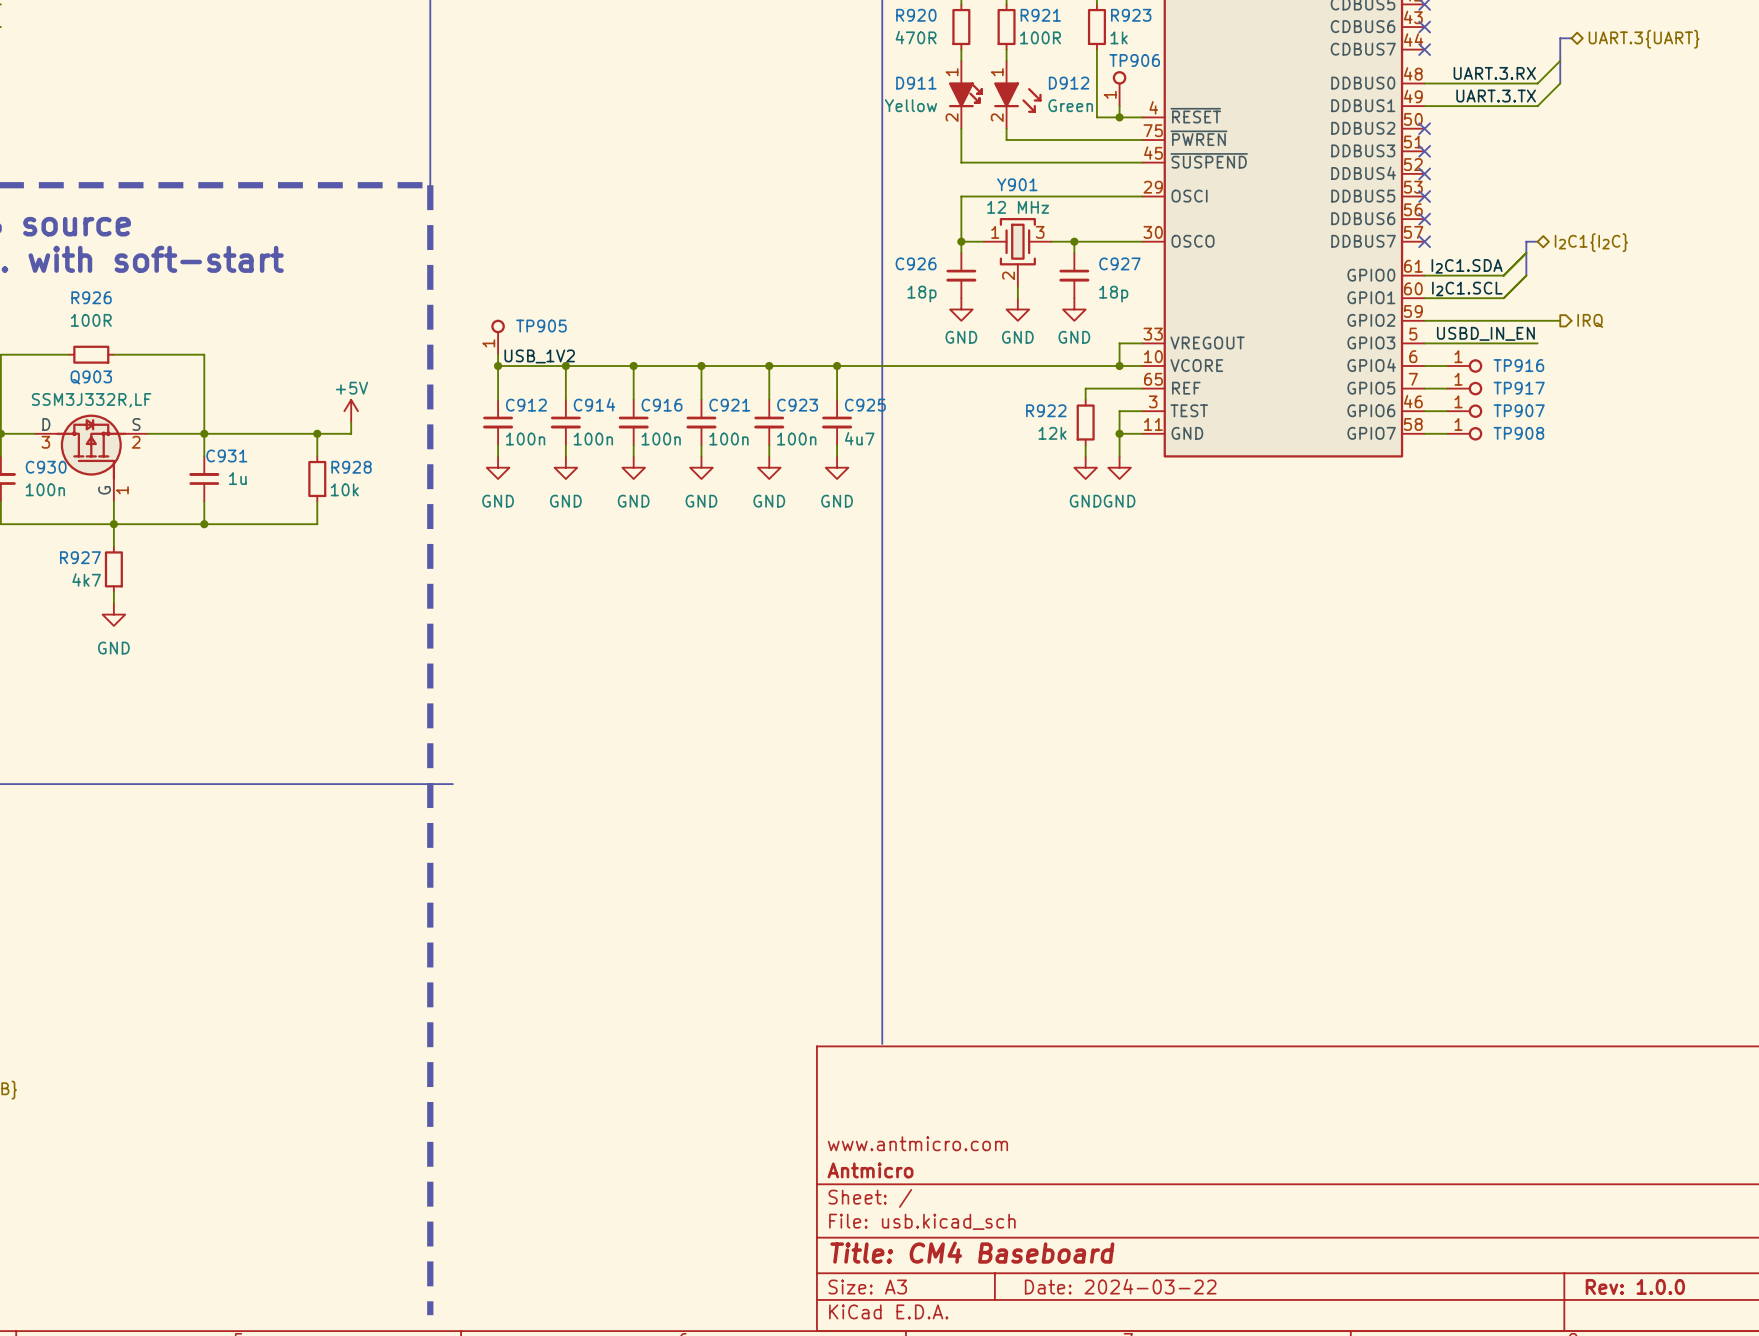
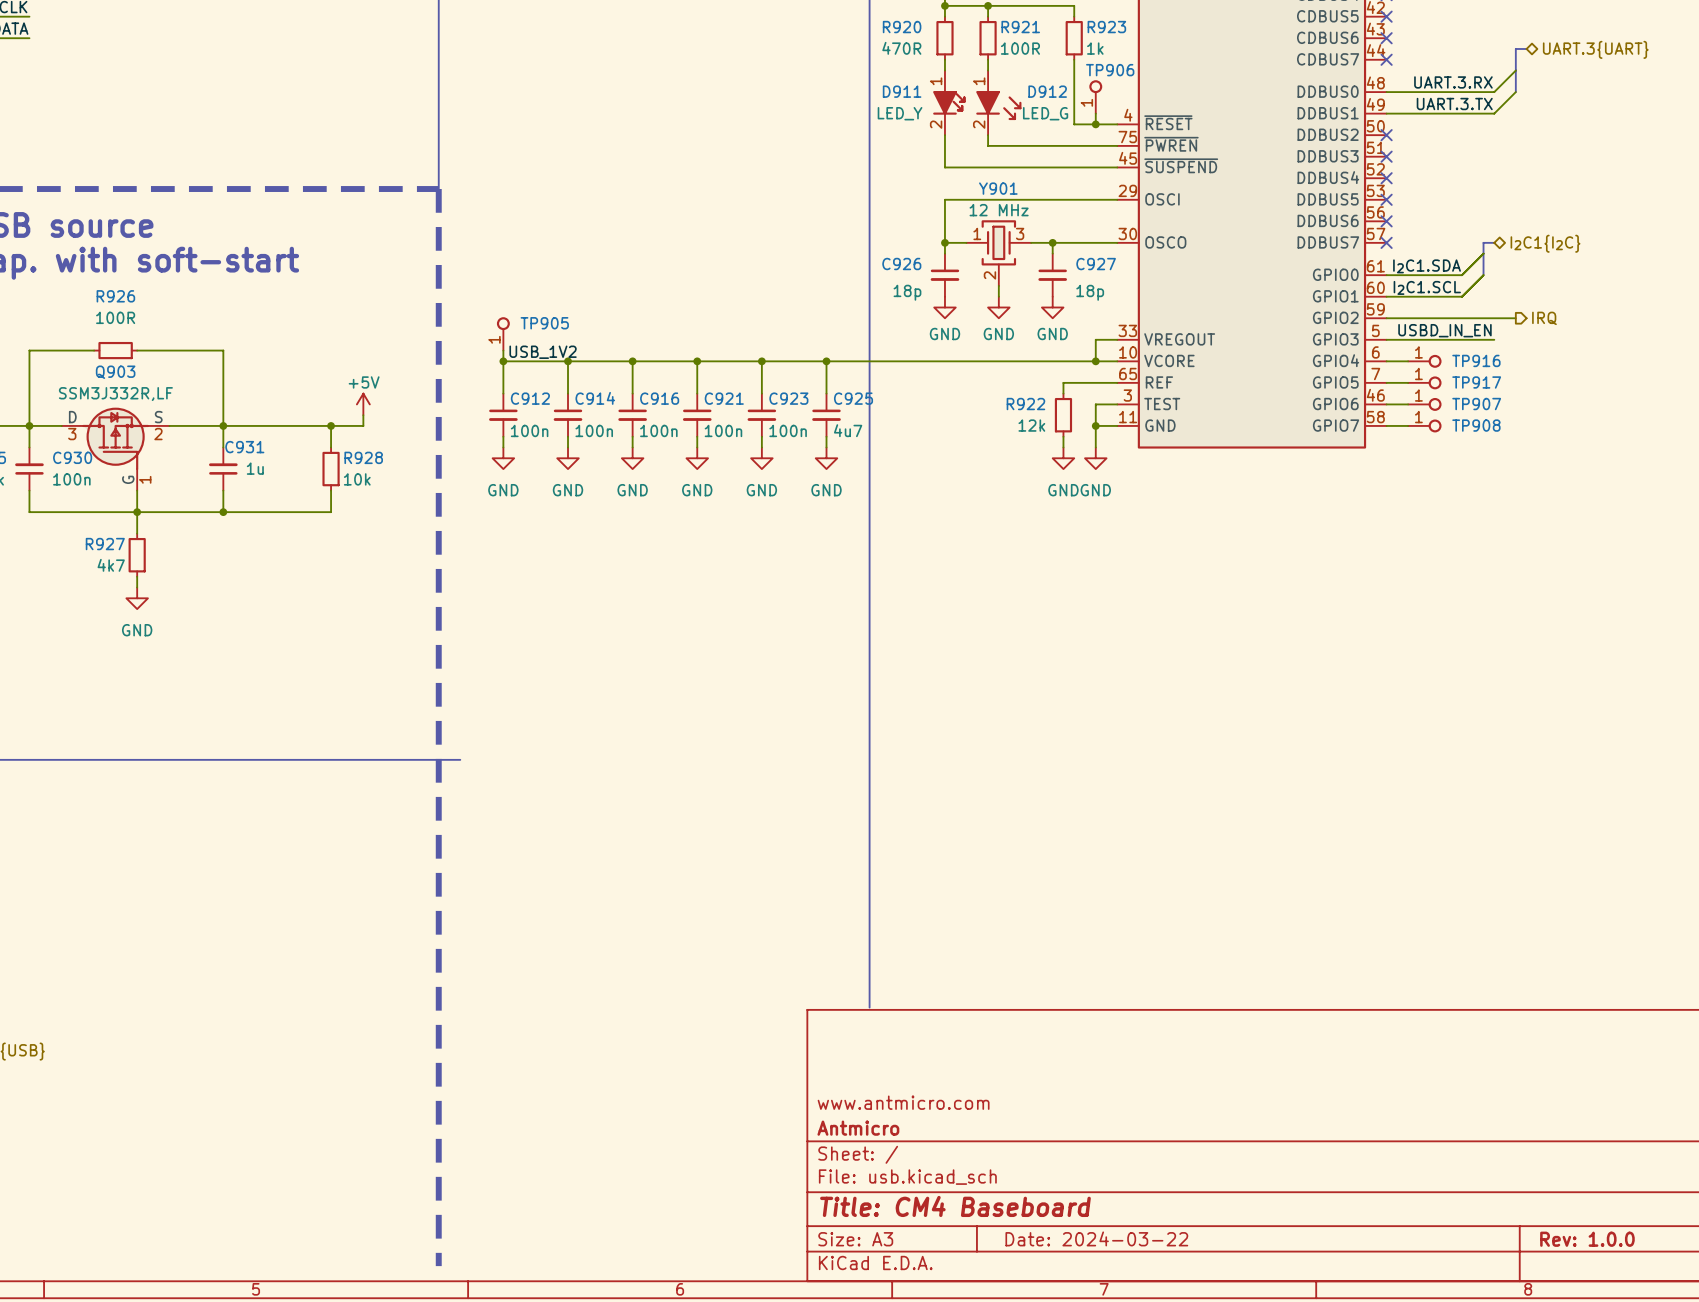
D911 text: Yellow (910, 105) -> none
D912 text: Green (1070, 105) -> none
D911 value: none -> LED_Y (900, 113)
D912 value: none -> LED_G (1045, 113)

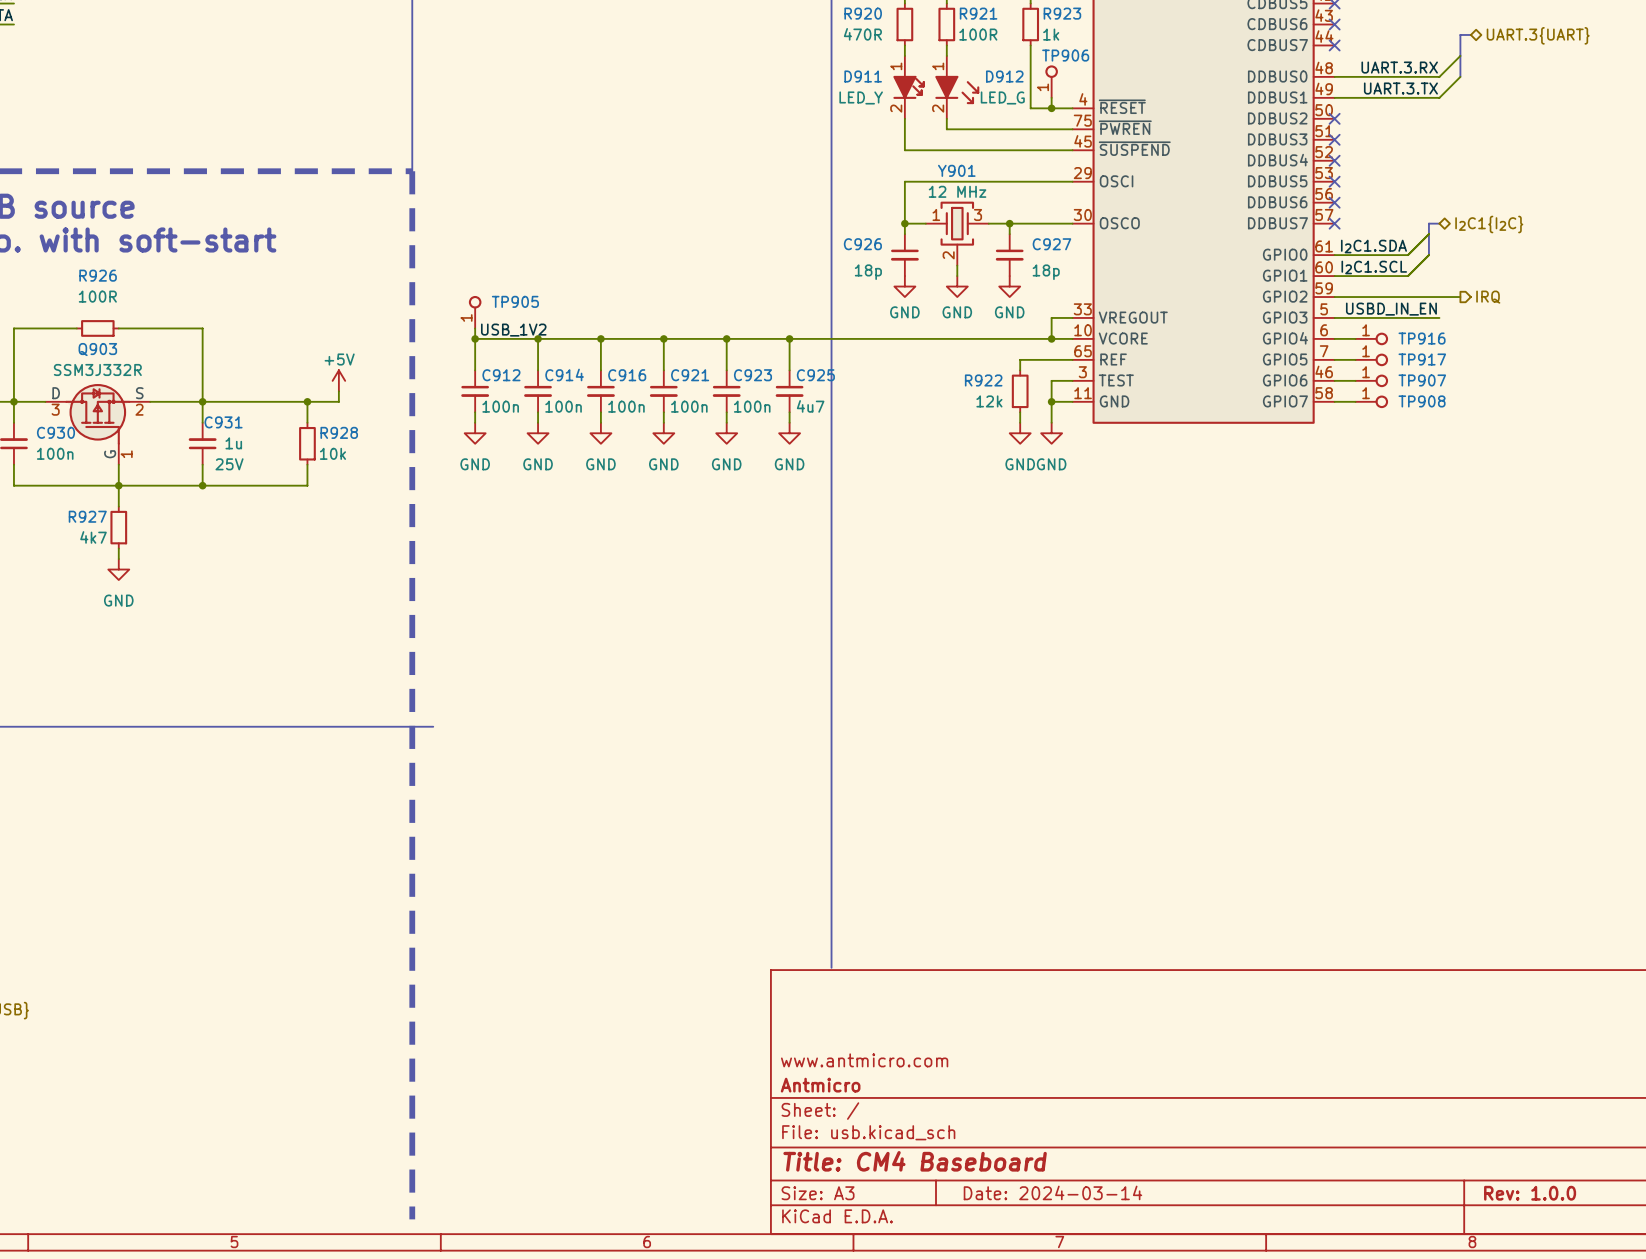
Q903 value: none -> SSM3J332R (97, 369)
Q903 text: SSM3J332R,LF (115, 394) -> none
C931 text: none -> 25V (229, 464)
title block: Date: 2024-03-22 (1096, 1238) -> Date: 2024-03-14 (1052, 1192)

